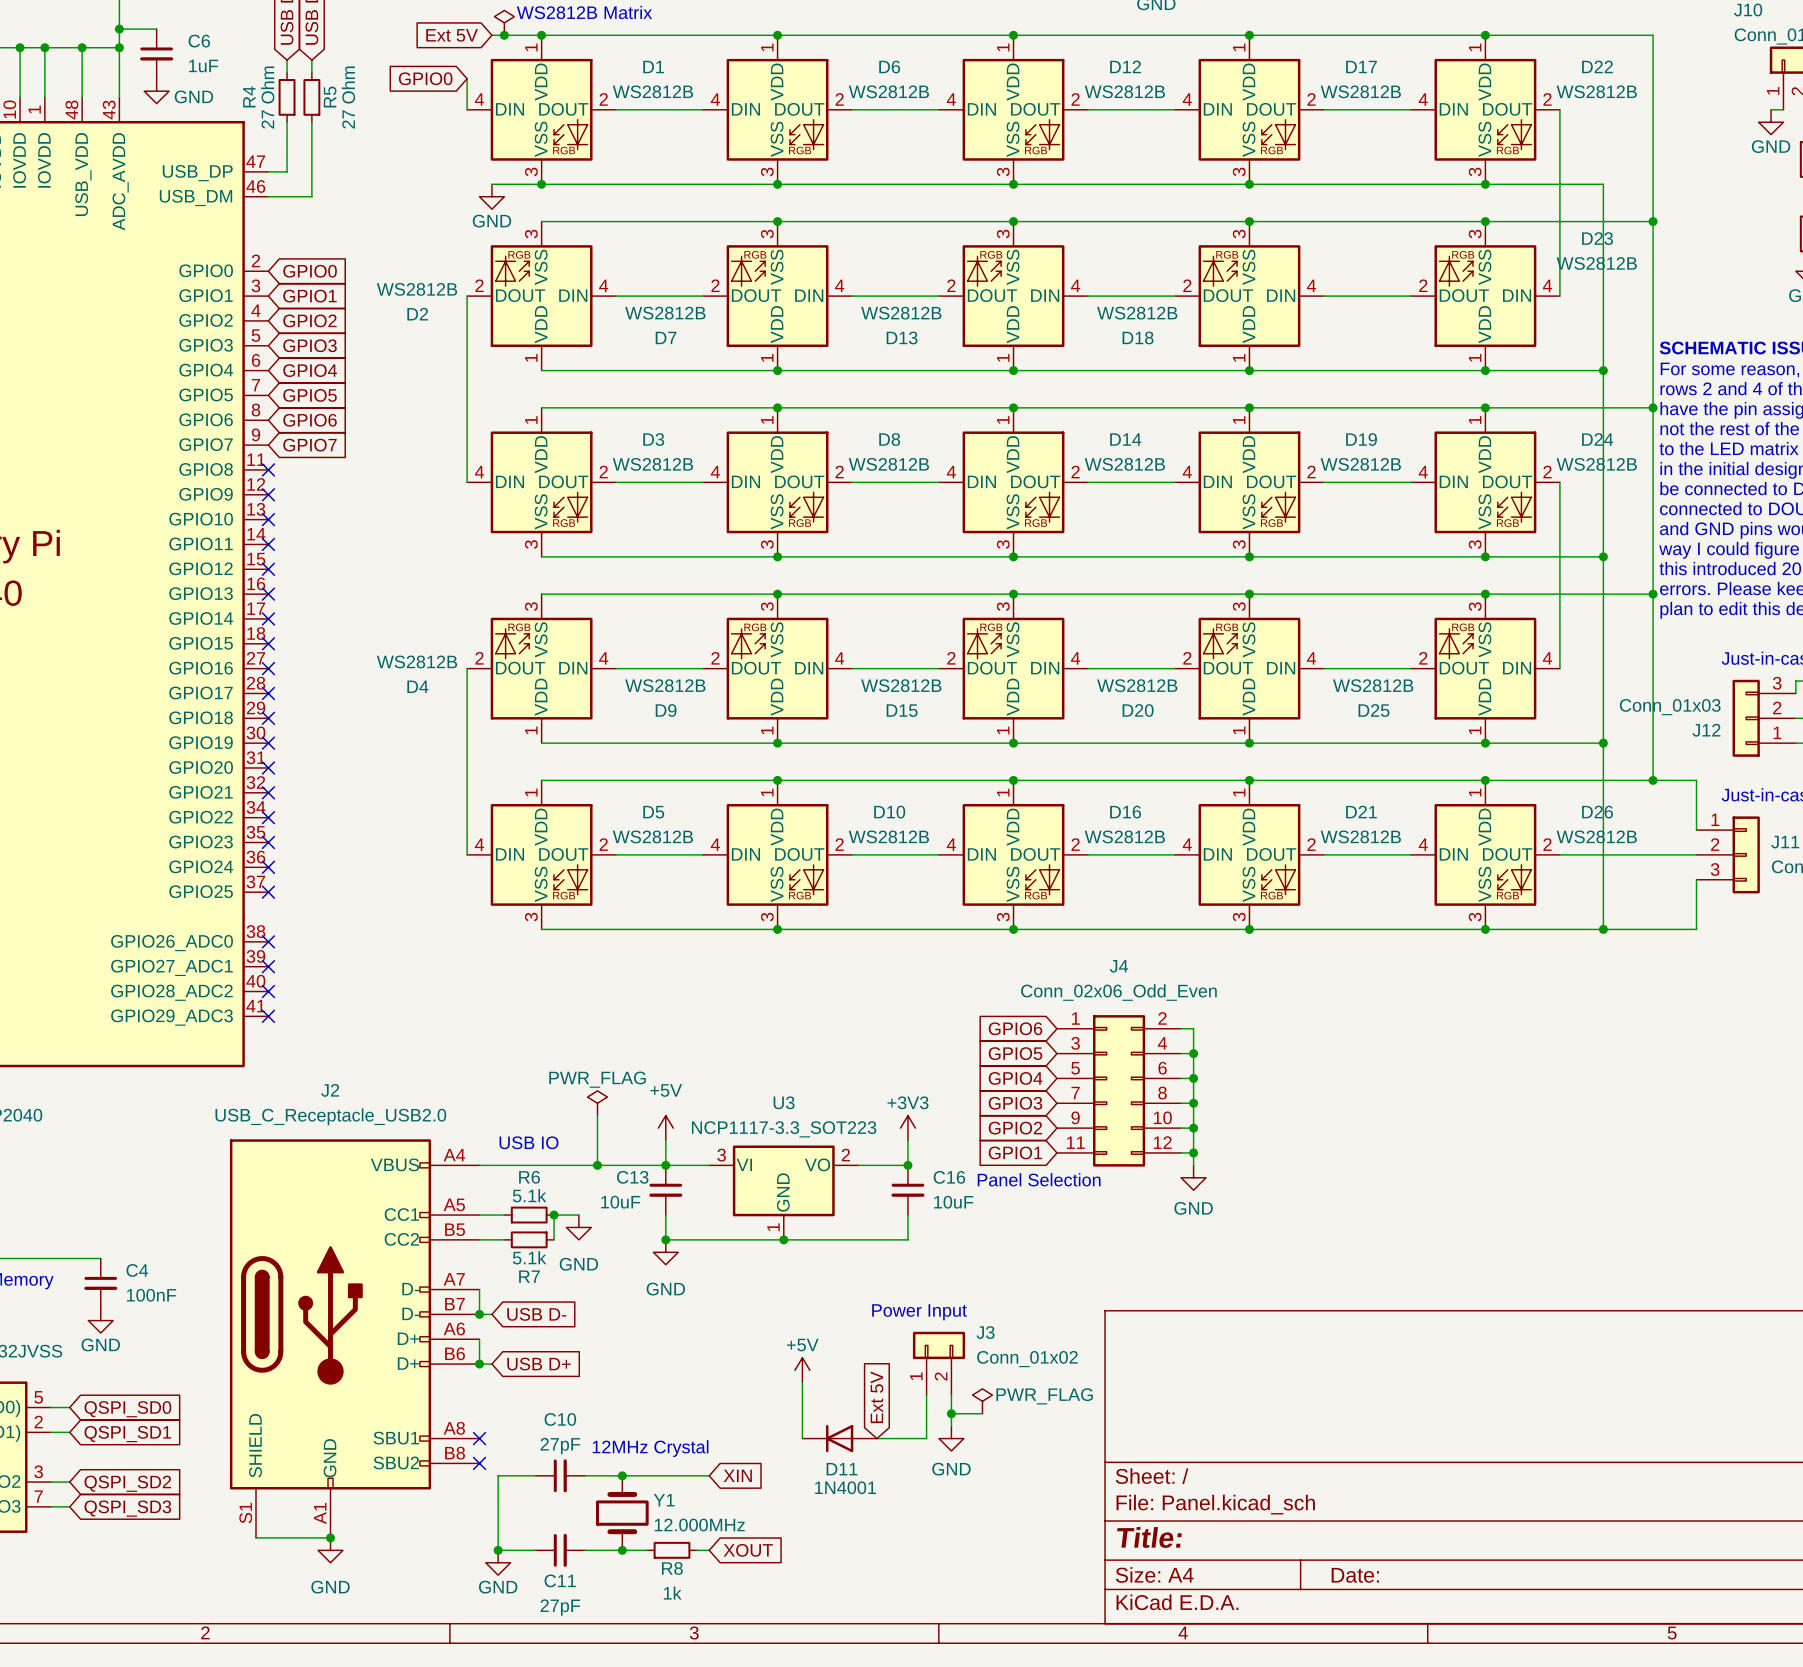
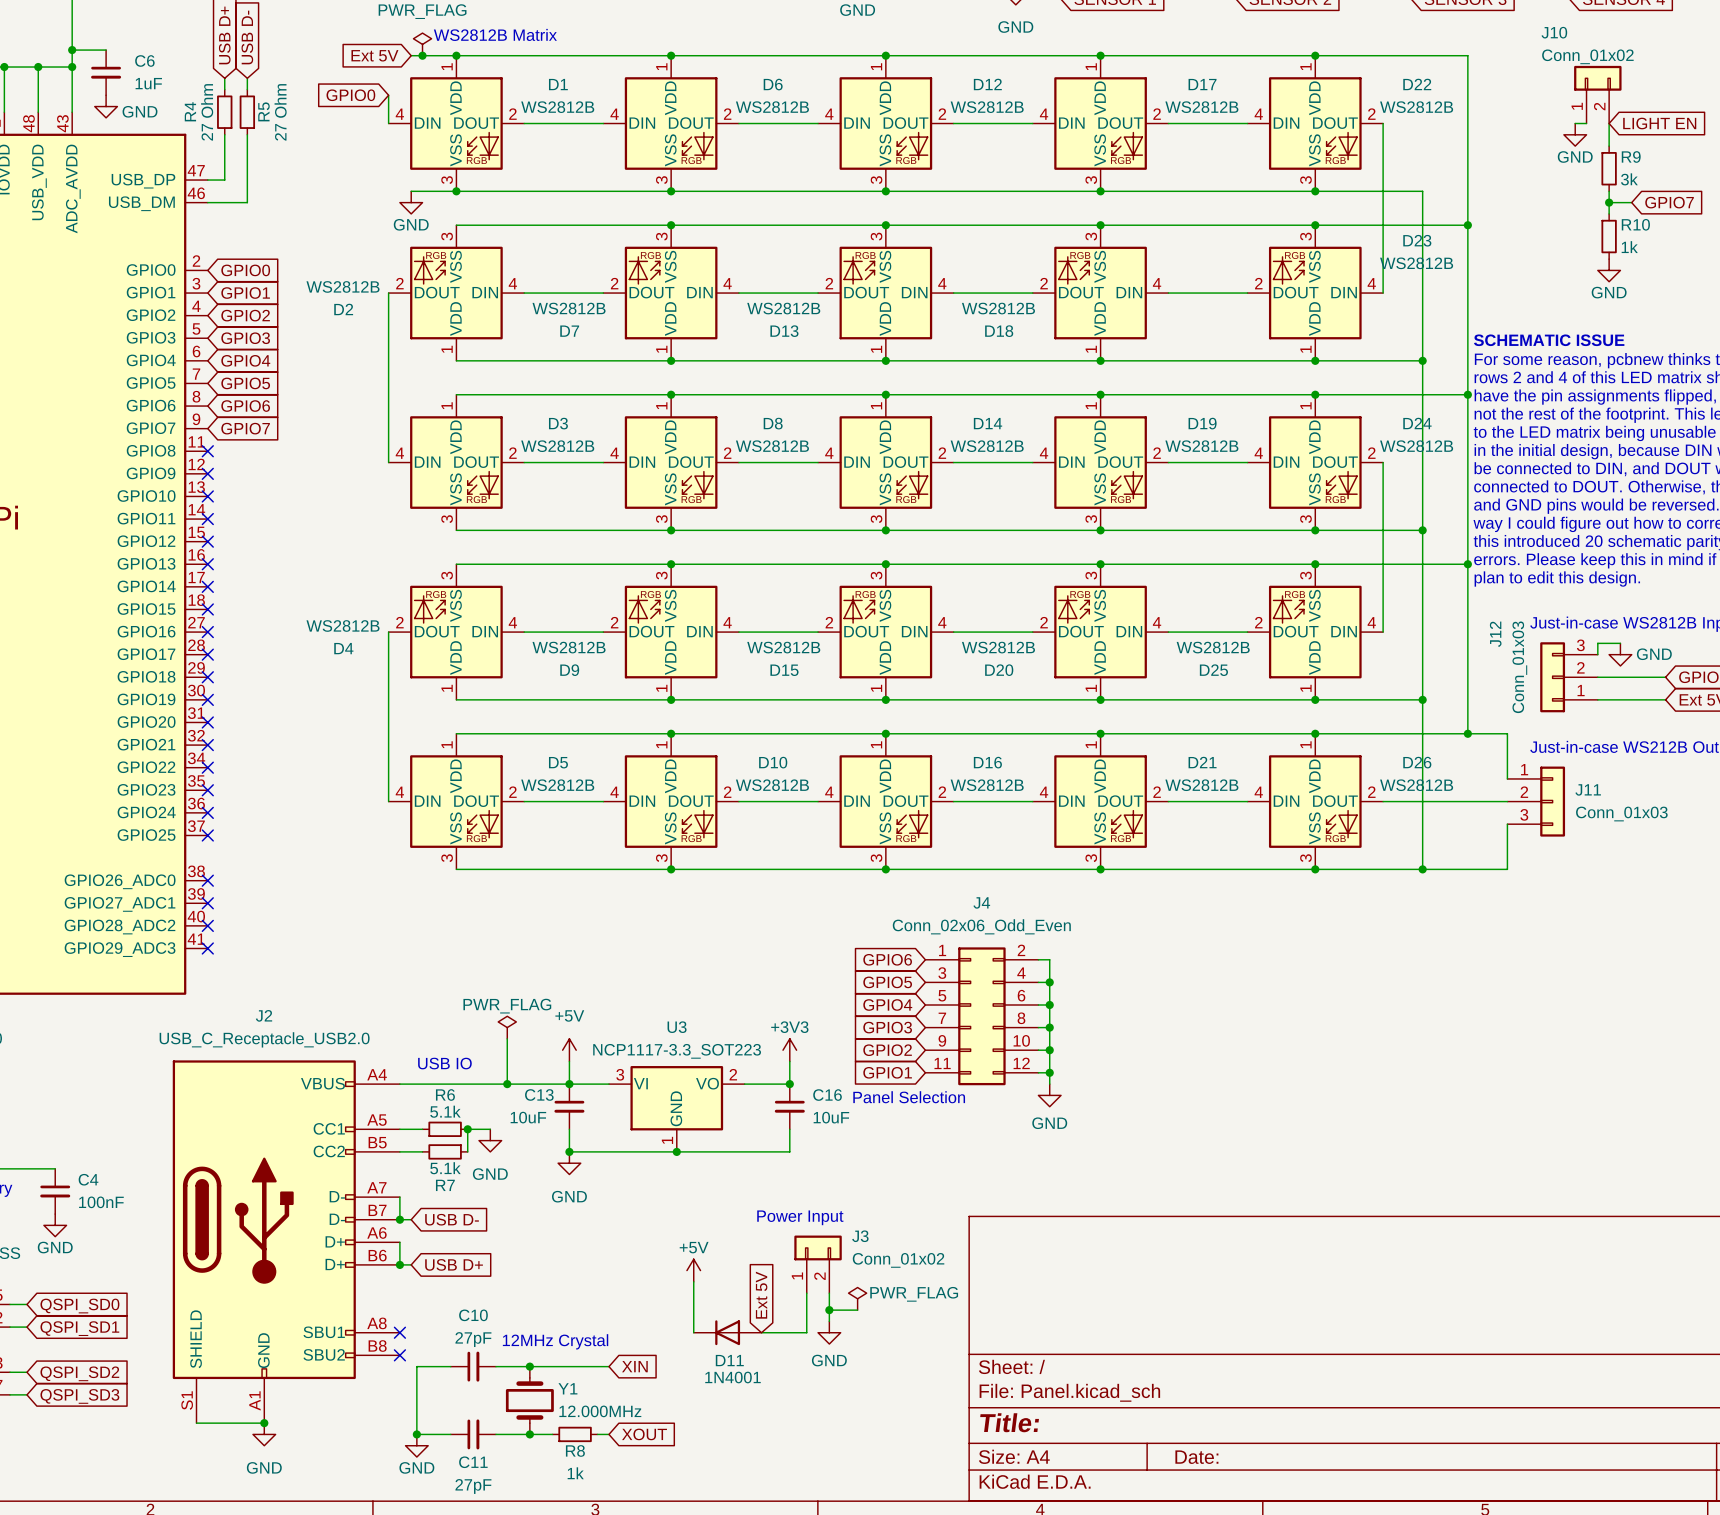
J12 value rotation: 0° (1670, 707) -> 90° counterclockwise (1519, 667)
J12 name rotation: 0° (1706, 730) -> 90° counterclockwise (1495, 634)
J12 name position: J12 (1706, 730) -> J12 (1495, 634)

